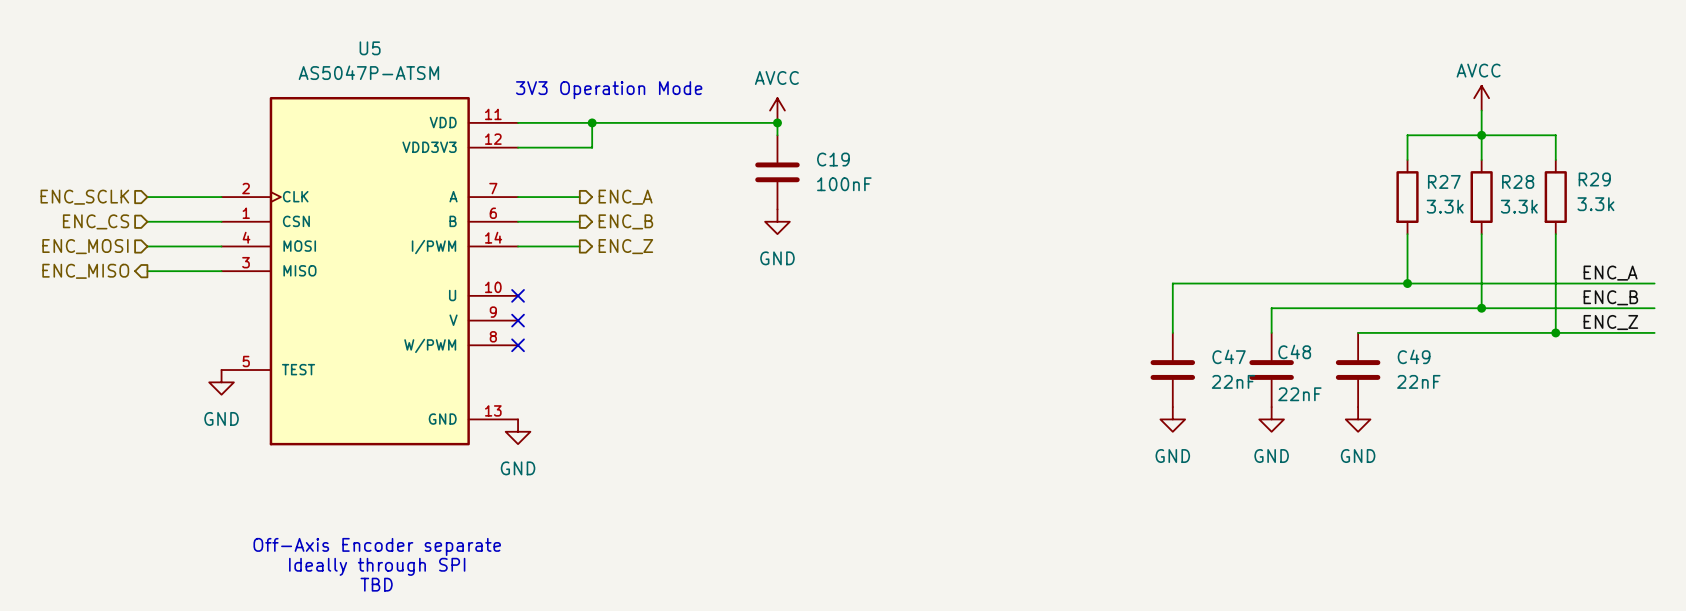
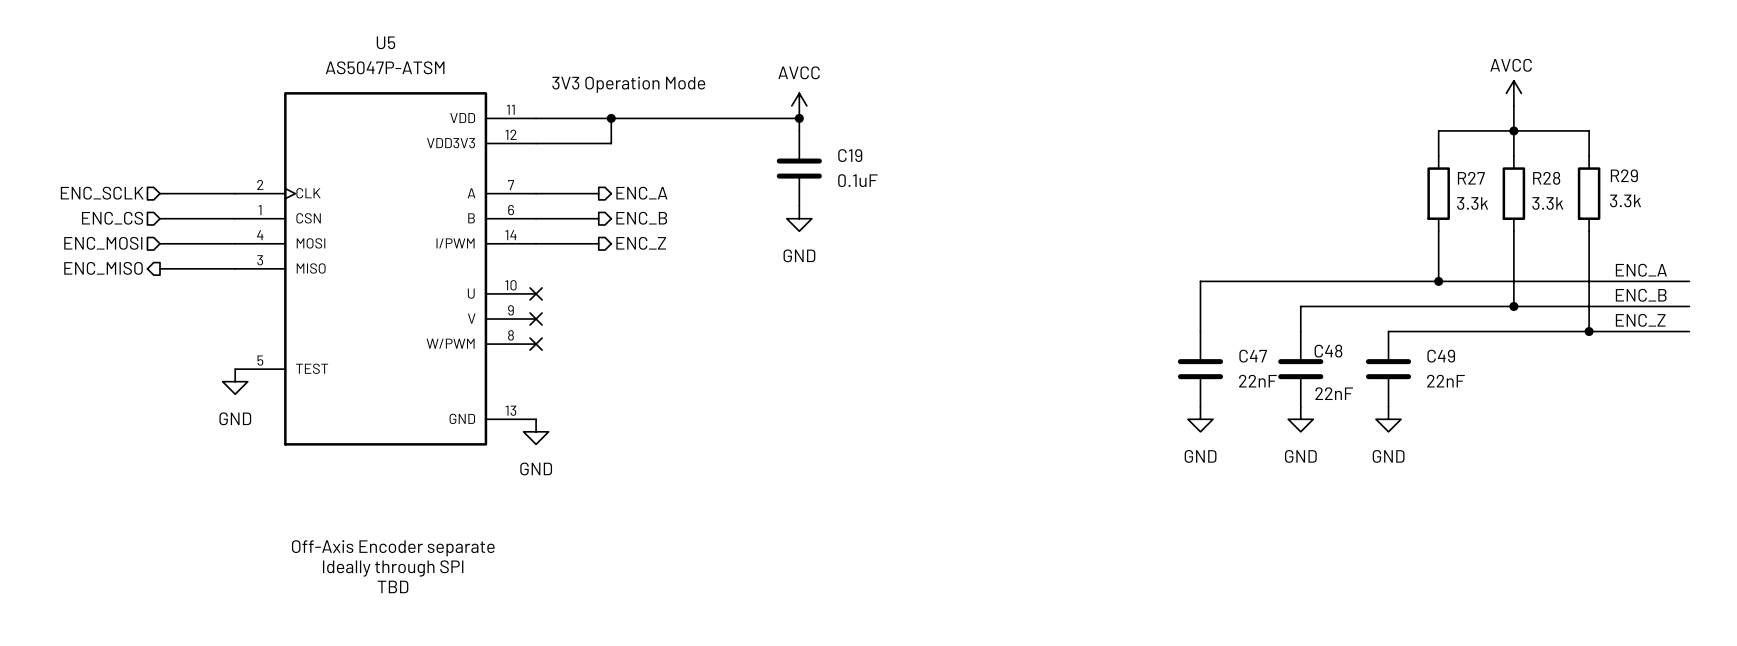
C19 value: 100nF (844, 184) -> 0.1uF (857, 180)

